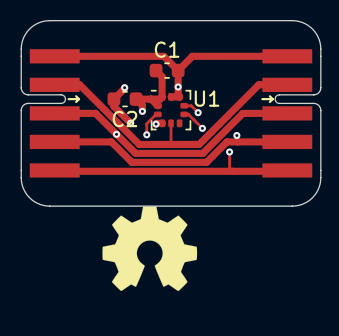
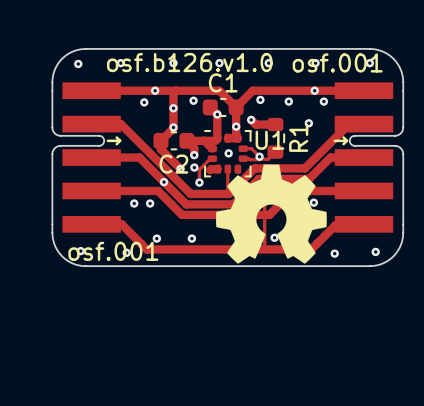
via: none -> (120, 63)
via: none -> (173, 63)
text: none -> osf.b126.v1.0 (189, 62)
via: none -> (219, 63)
via: none -> (268, 63)
via: none -> (315, 63)
text: none -> osf.001 (337, 62)
via: none -> (369, 63)
via: none -> (78, 63)
via: none -> (155, 90)
track: none -> (176, 90) (173, 93) (173, 127)
via: none -> (314, 90)
via: none -> (193, 100)
via: none -> (260, 99)
via: none -> (288, 101)
via: none -> (323, 101)
via: none -> (144, 102)
via: none -> (173, 108)
via: none -> (217, 114)
track: none -> (251, 119) (255, 124) (275, 124)
via: none -> (251, 119)
via: none -> (308, 123)
track: (274, 84) (258, 84) (199, 144) (172, 144) -> (349, 124) (304, 168) (254, 168) (229, 193)
R1: none -> (275, 138)
via: none -> (228, 153)
track: (258, 113) (242, 113) (202, 153) (175, 153) -> (330, 157) (309, 178) (258, 178) (233, 204)
track: (188, 114) (202, 128) -> (248, 158) (268, 159) (275, 152)
via: none -> (194, 167)
via: (156, 124) -> none
via: (202, 128) -> none
via position: (236, 135) -> (313, 202)
track: (229, 151) (229, 167) (232, 171) -> none
via: none -> (134, 203)
via: none -> (150, 203)
track: none -> (264, 202) (264, 249)
track: (54, 170) (262, 171) -> (91, 224) (121, 224) (146, 249) (311, 249) (335, 225)
via: none -> (274, 237)
via: none -> (156, 238)
via: none -> (191, 238)
via: none -> (80, 251)
text: none -> osf.001 (113, 251)
via: none -> (126, 252)
via: none -> (375, 251)
via: none -> (334, 253)
drawing position: (149, 248) -> (271, 214)

